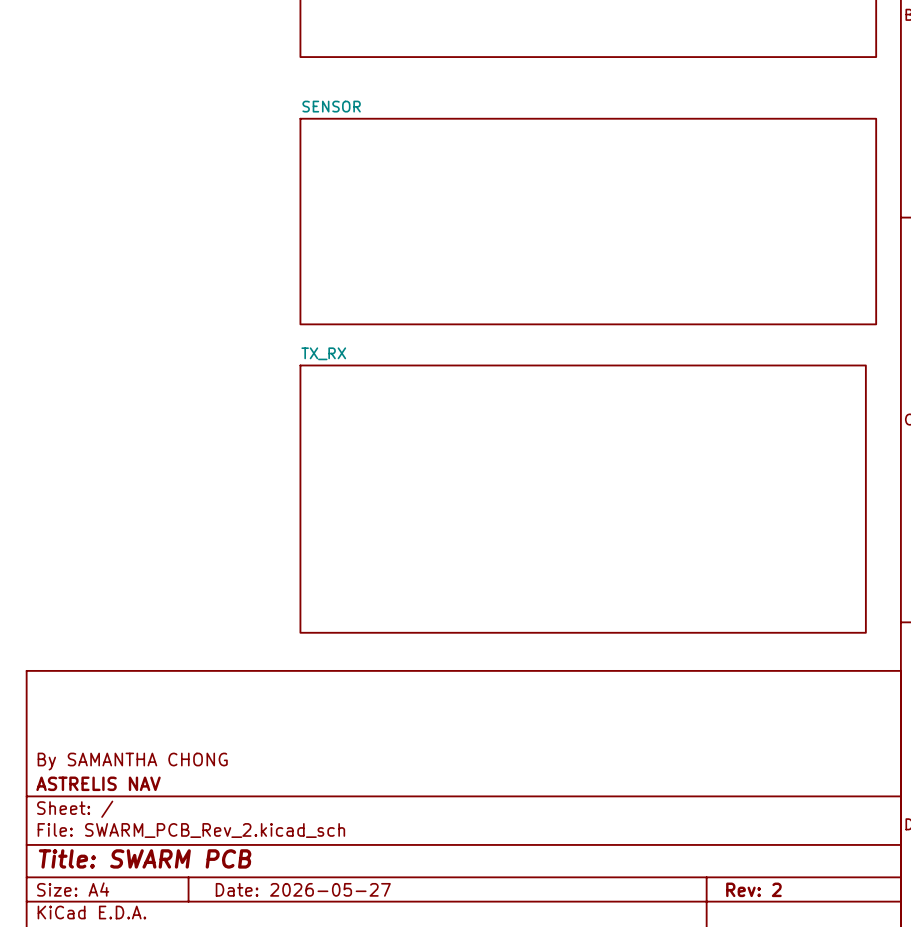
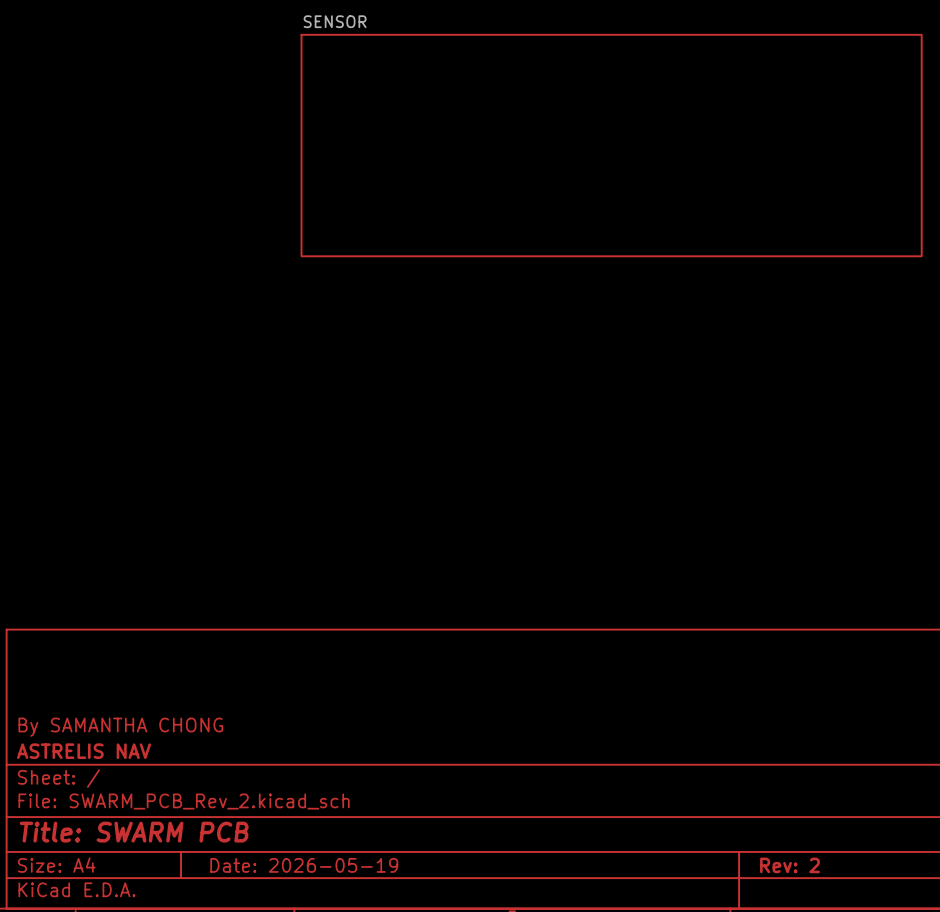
sheet TX_RX: (583, 499) -> none
title block: Date: 2026-05-27 (303, 889) -> Date: 2026-05-19 (304, 865)

